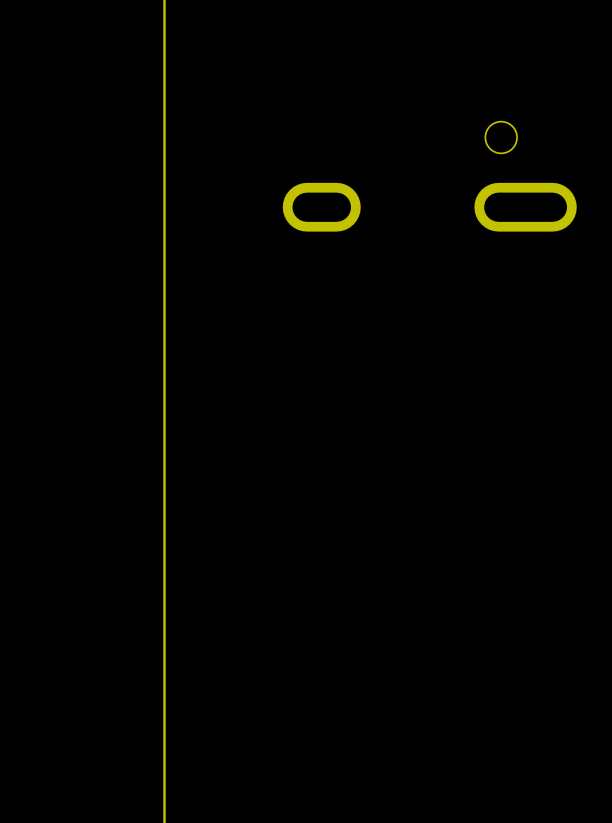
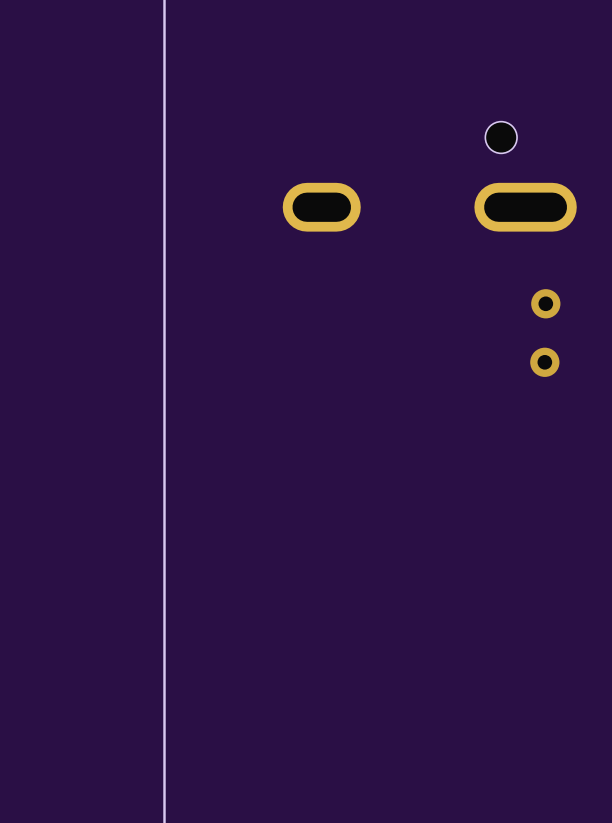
via: none -> (545, 303)
via: none -> (544, 362)

